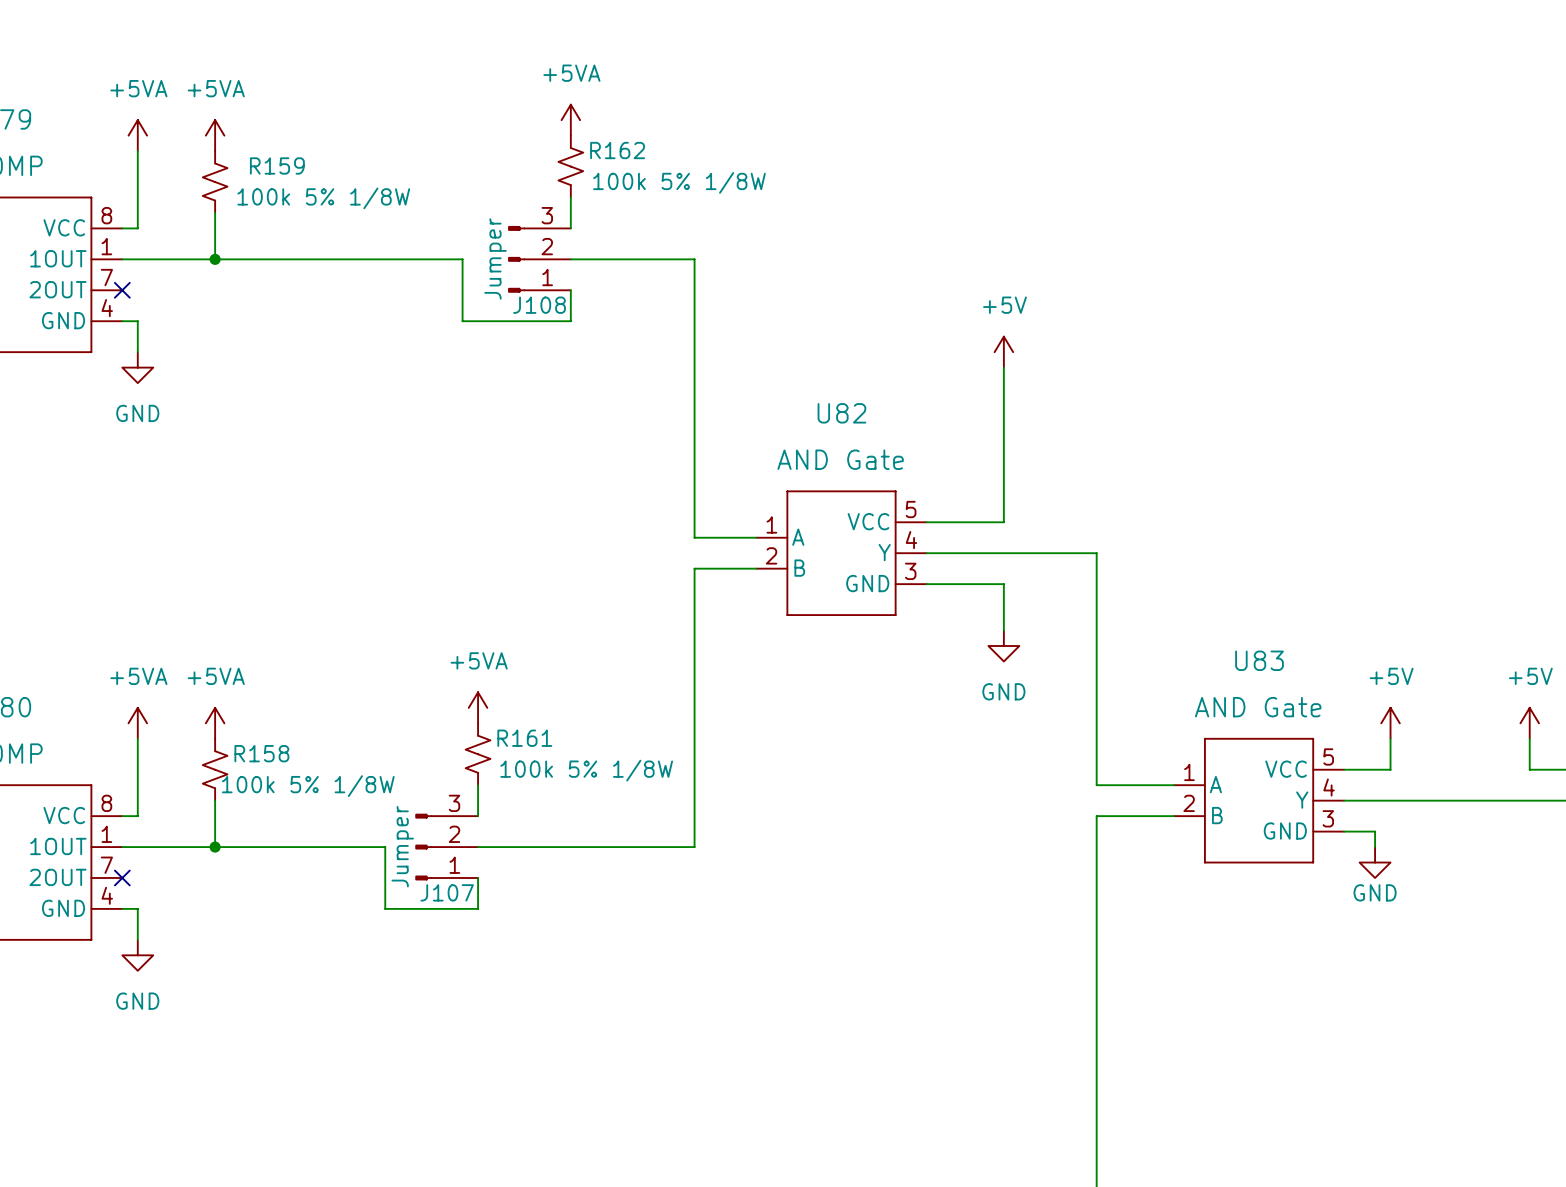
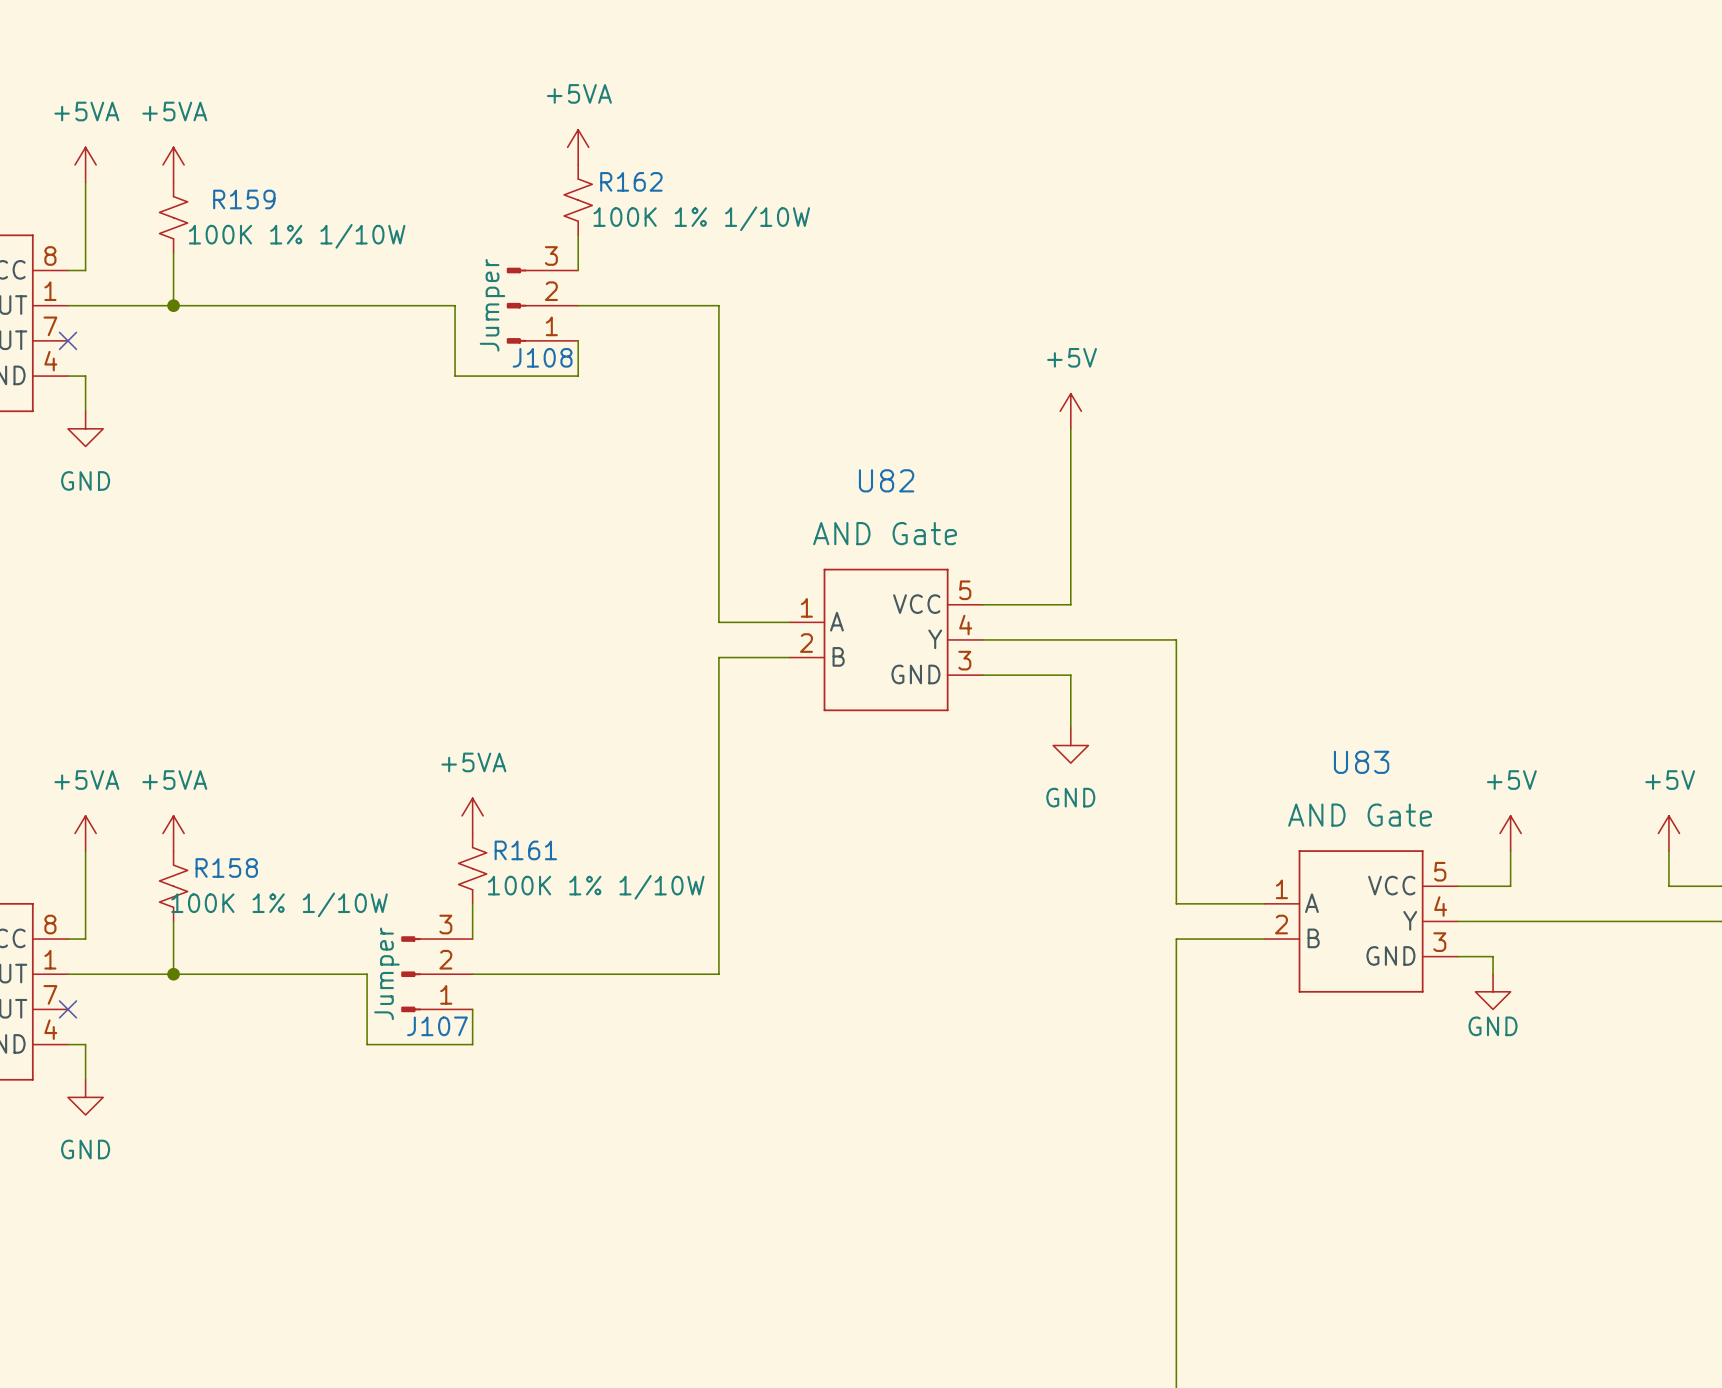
R162 value: 100k 5% 1/8W (679, 182) -> 100K 1% 1/10W (701, 218)
R159 value: 100k 5% 1/8W (323, 198) -> 100K 1% 1/10W (297, 236)
R161 value: 100k 5% 1/8W (586, 770) -> 100K 1% 1/10W (596, 887)
R158 value: 100k 5% 1/8W (308, 786) -> 100K 1% 1/10W (279, 904)

